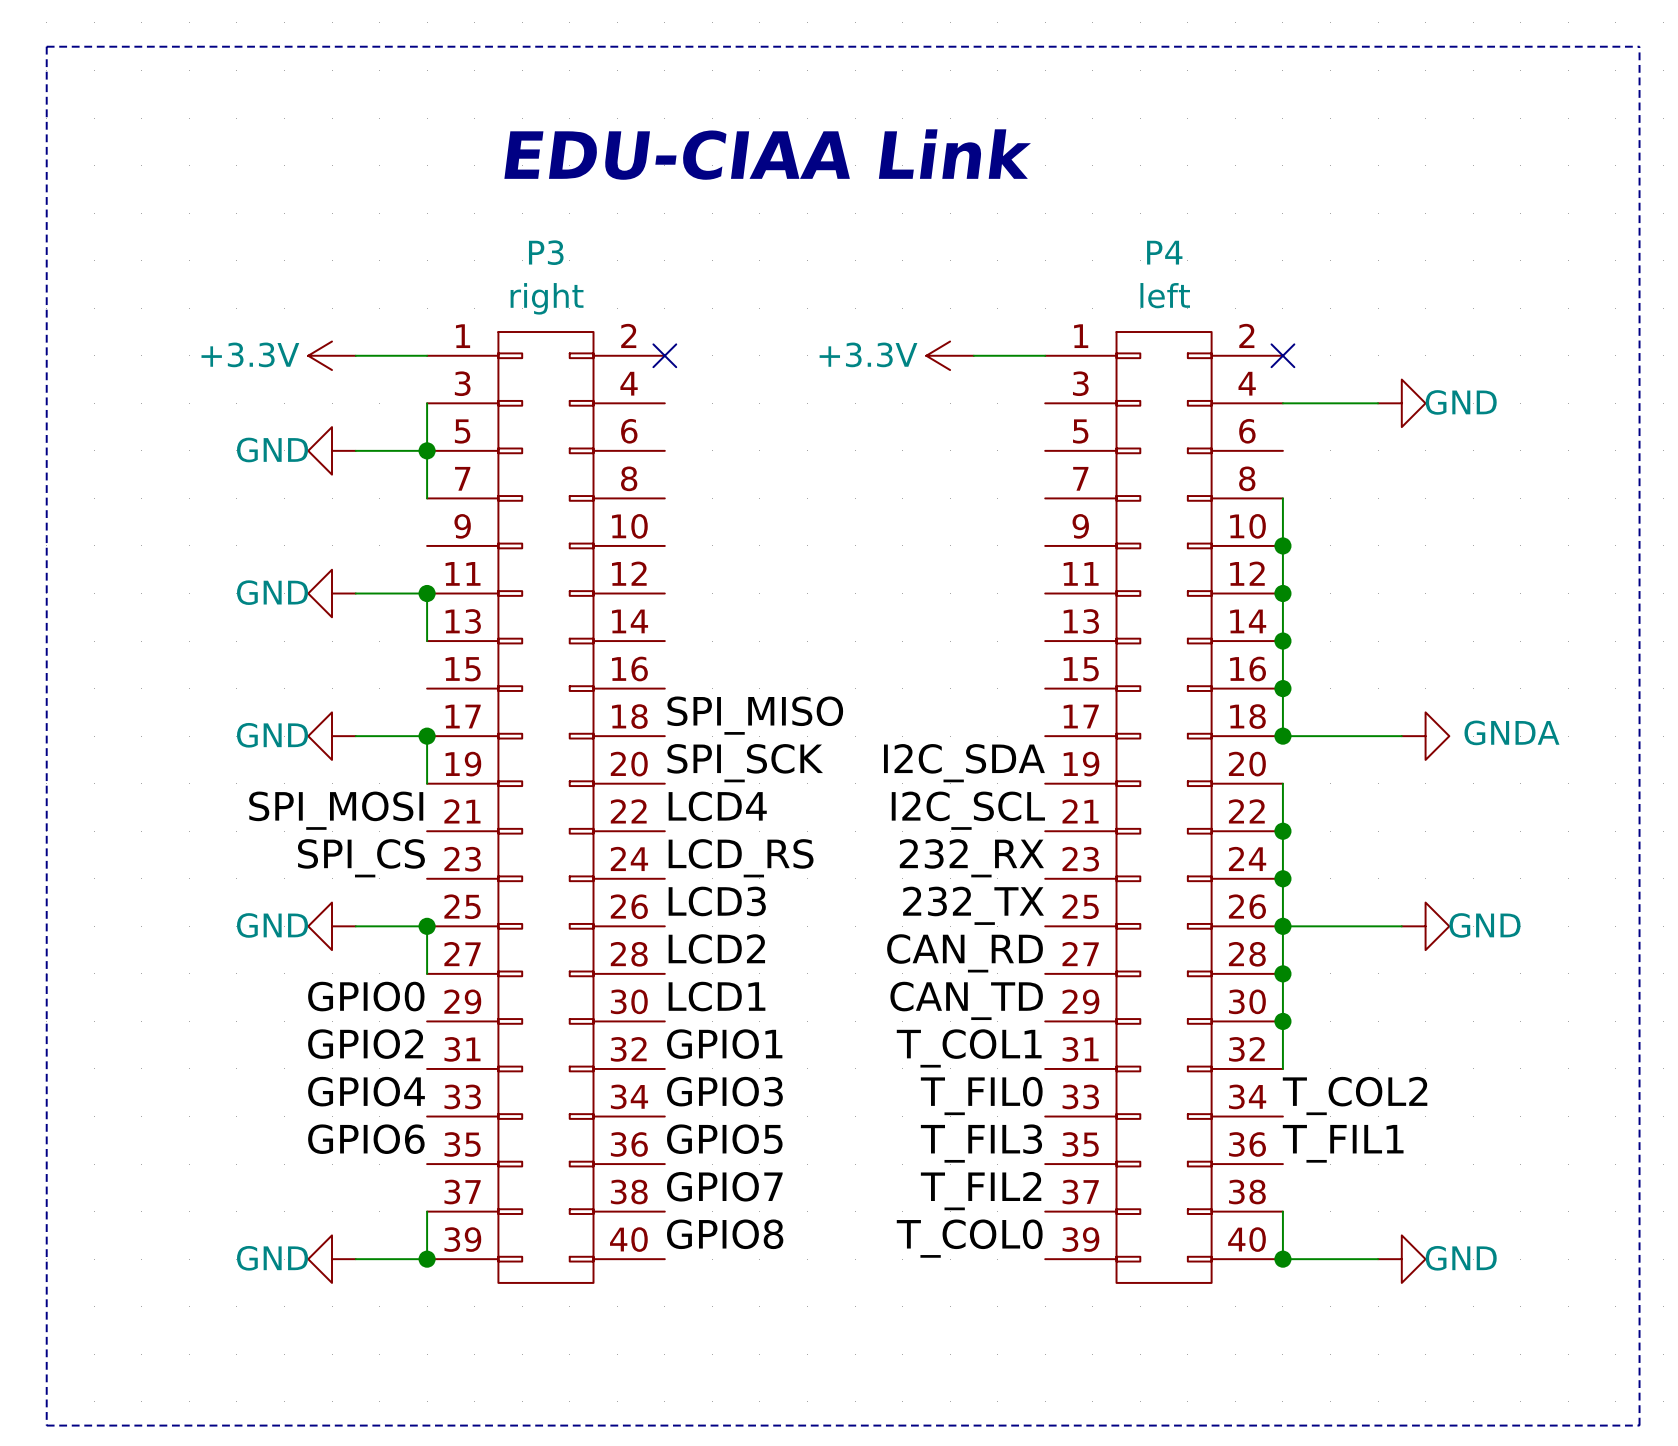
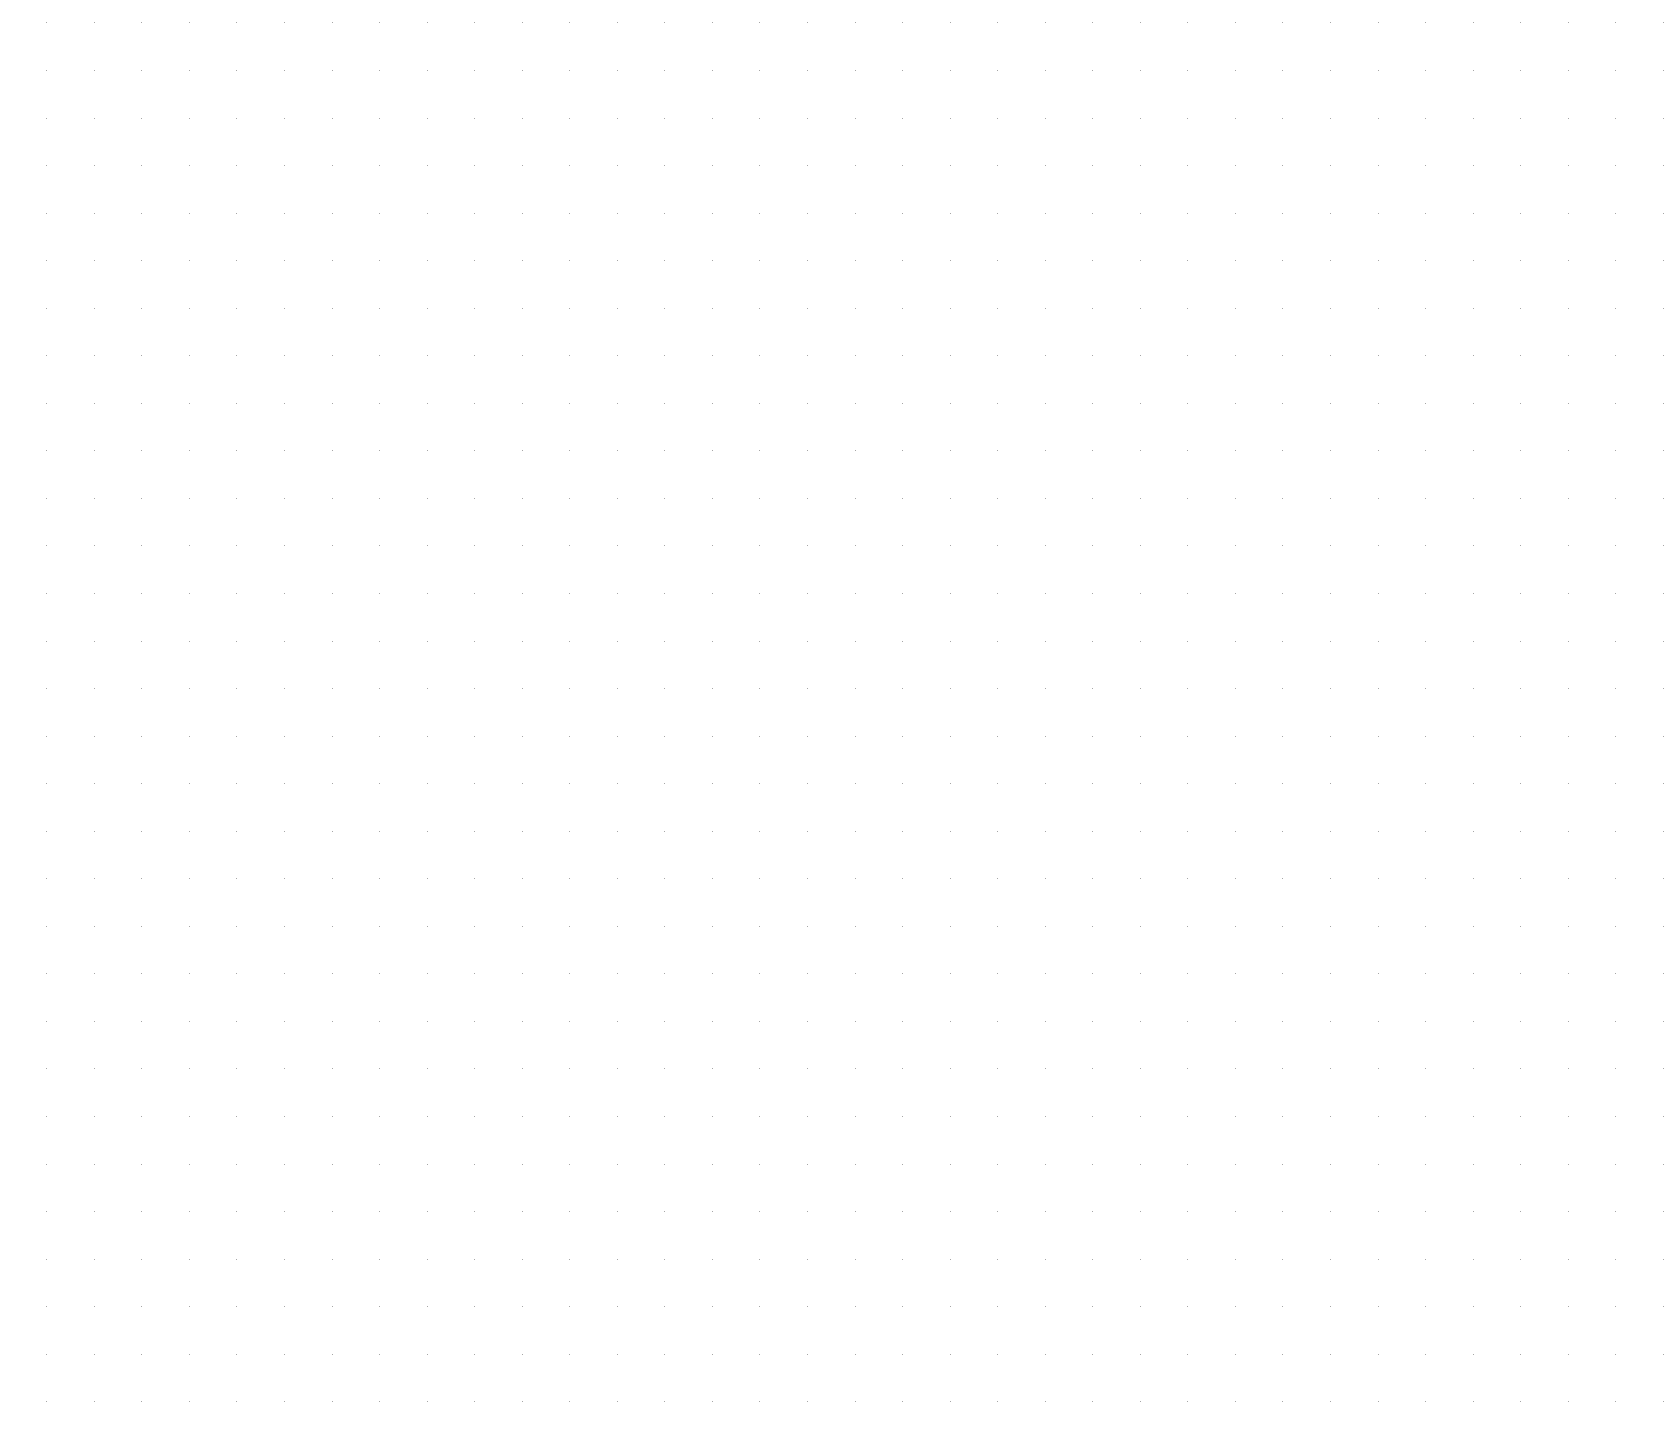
line: (46, 46) (1639, 46) (1639, 1425) (46, 1425) (46, 46) -> none
text: EDU-CIAA Link (767, 154) -> none
power symbol: +3.3V (332, 355) -> none
wire: (355, 355) (427, 355) -> none
no-connect mark: (664, 355) -> none
power symbol: +3.3V (950, 355) -> none
wire: (973, 355) (1045, 355) -> none
no-connect mark: (1282, 355) -> none
wire: (427, 403) (427, 498) -> none
wire: (1282, 403) (1378, 403) -> none
power symbol: GND (1401, 403) -> none
power symbol: GND (332, 450) -> none
wire: (355, 450) (427, 450) -> none
junction: (427, 450) -> none
wire: (1282, 498) (1282, 736) (1401, 736) -> none
junction: (1282, 545) -> none
power symbol: GND (332, 593) -> none
wire: (355, 593) (427, 593) (427, 641) -> none
junction: (427, 593) -> none
junction: (1282, 593) -> none
junction: (1282, 641) -> none
junction: (1282, 688) -> none
label: SPI_MISO (755, 715) -> none
power symbol: GND (332, 736) -> none
wire: (355, 736) (427, 736) (427, 783) -> none
junction: (427, 736) -> none
junction: (1282, 736) -> none
power symbol: GNDA (1425, 736) -> none
label: SPI_SCK (745, 763) -> none
label: I2C_SDA (964, 763) -> none
wire: (1282, 783) (1282, 1068) -> none
label: LCD4 (717, 806) -> none
P3: right (545, 807) -> none
P4: left (1164, 807) -> none
label: SPI_MOSI (336, 810) -> none
label: I2C_SCL (968, 810) -> none
junction: (1282, 831) -> none
label: SPI_CS (361, 858) -> none
label: LCD_RS (741, 858) -> none
label: 232_RX (971, 858) -> none
junction: (1282, 878) -> none
label: LCD3 (717, 901) -> none
label: 232_TX (973, 905) -> none
power symbol: GND (332, 926) -> none
wire: (355, 926) (427, 926) (427, 973) -> none
junction: (427, 926) -> none
wire: (1282, 926) (1401, 926) -> none
junction: (1282, 926) -> none
power symbol: GND (1425, 926) -> none
label: LCD2 (716, 949) -> none
label: CAN_RD (965, 953) -> none
junction: (1282, 973) -> none
label: GPIO0 (366, 996) -> none
label: LCD1 (717, 996) -> none
label: CAN_TD (966, 1000) -> none
junction: (1282, 1021) -> none
label: GPIO2 (365, 1044) -> none
label: GPIO1 (724, 1044) -> none
label: T_COL1 (969, 1048) -> none
label: GPIO4 (366, 1091) -> none
label: GPIO3 (724, 1091) -> none
label: T_FIL0 (981, 1095) -> none
label: T_COL2 (1355, 1095) -> none
label: GPIO6 (366, 1139) -> none
label: GPIO5 (724, 1139) -> none
label: T_FIL3 (981, 1143) -> none
label: T_FIL1 (1343, 1143) -> none
label: GPIO7 (724, 1186) -> none
label: T_FIL2 (981, 1191) -> none
wire: (427, 1211) (427, 1259) (355, 1259) -> none
wire: (1282, 1211) (1282, 1259) (1378, 1259) -> none
label: GPIO8 (725, 1234) -> none
label: T_COL0 (969, 1238) -> none
power symbol: GND (332, 1259) -> none
junction: (427, 1259) -> none
junction: (1282, 1259) -> none
power symbol: GND (1401, 1259) -> none

